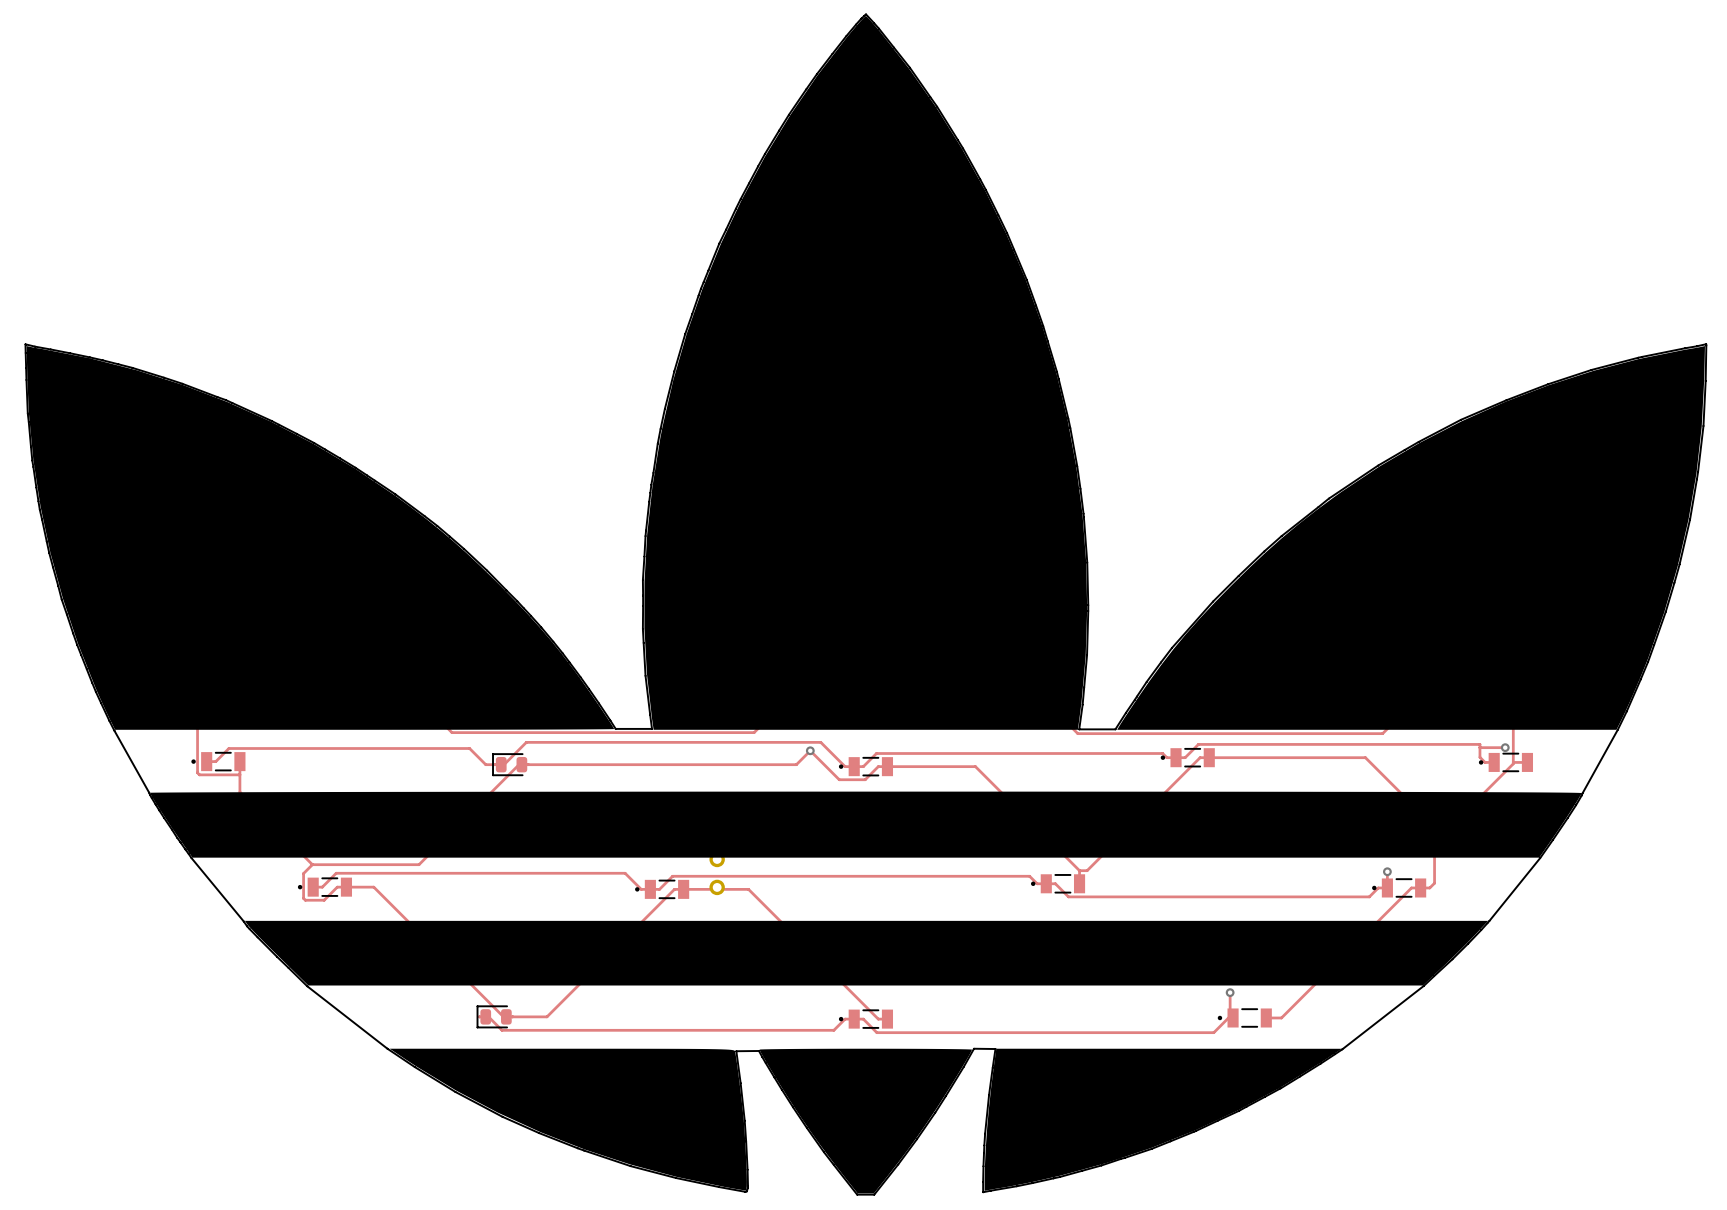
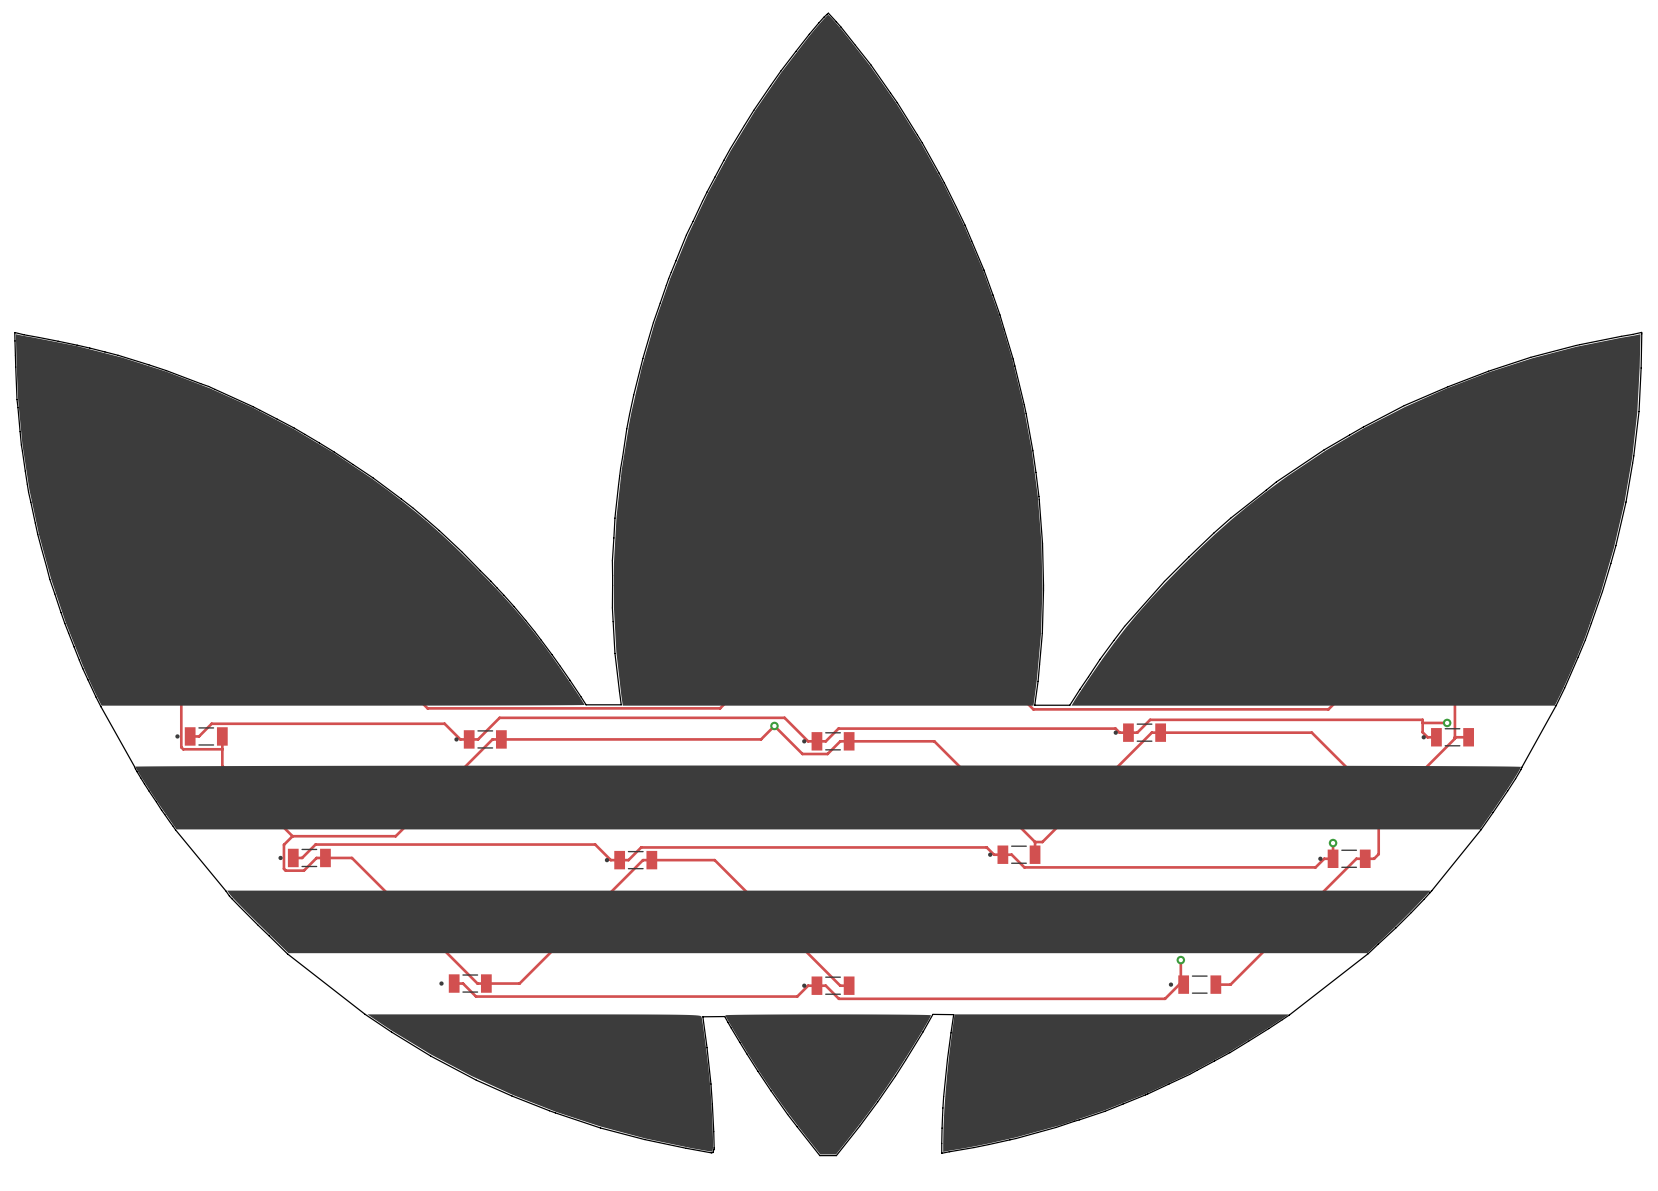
drawing: [26, 16, 1705, 1194] -> none
part: none -> (828, 584)
part footprint: [492, 753, 528, 776] -> [454, 730, 507, 749]
part: (717, 873) -> none
part footprint: [476, 1005, 512, 1029] -> [439, 974, 492, 993]

